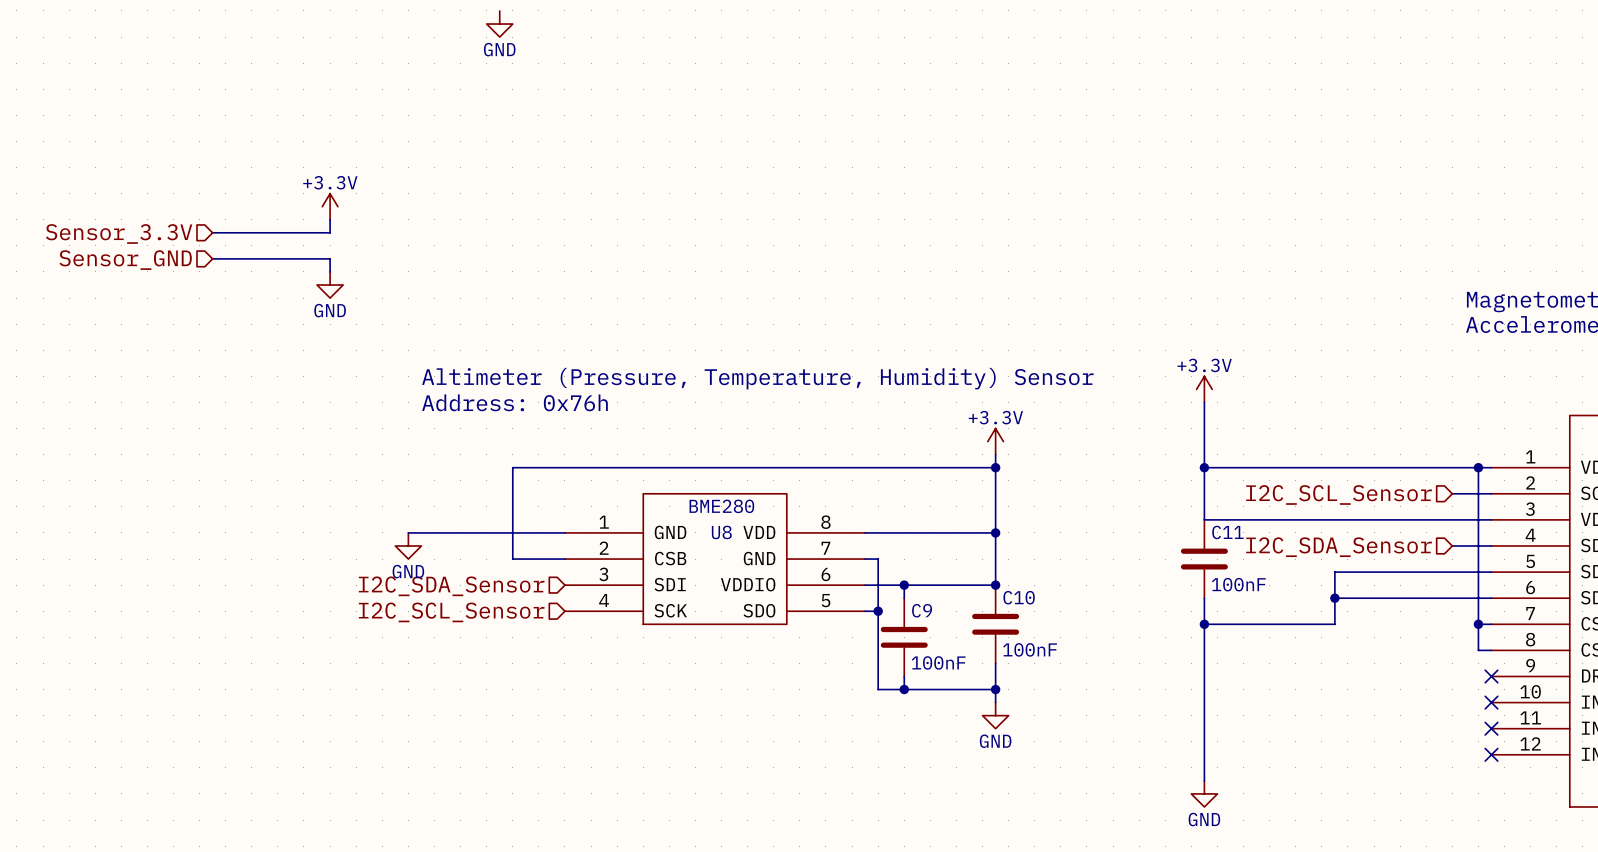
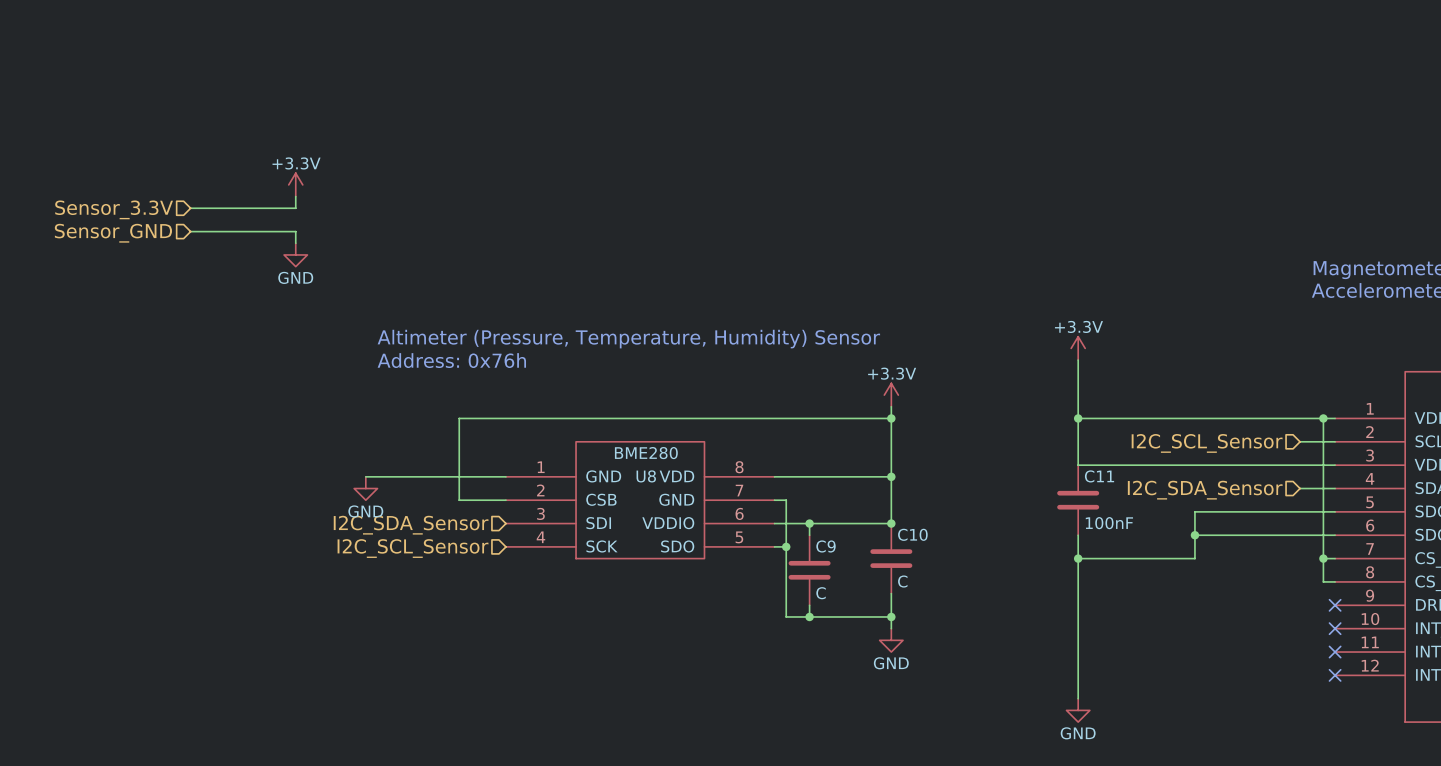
power symbol: GND (499, 24) -> none
C10 value: 100nF (1030, 649) -> C (902, 581)
C9 value: 100nF (938, 662) -> C (821, 593)

